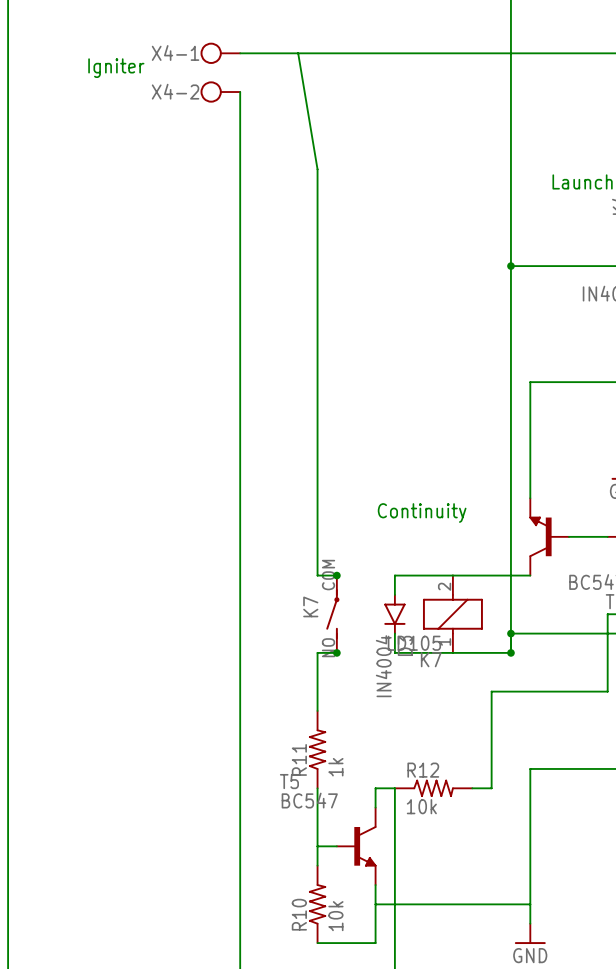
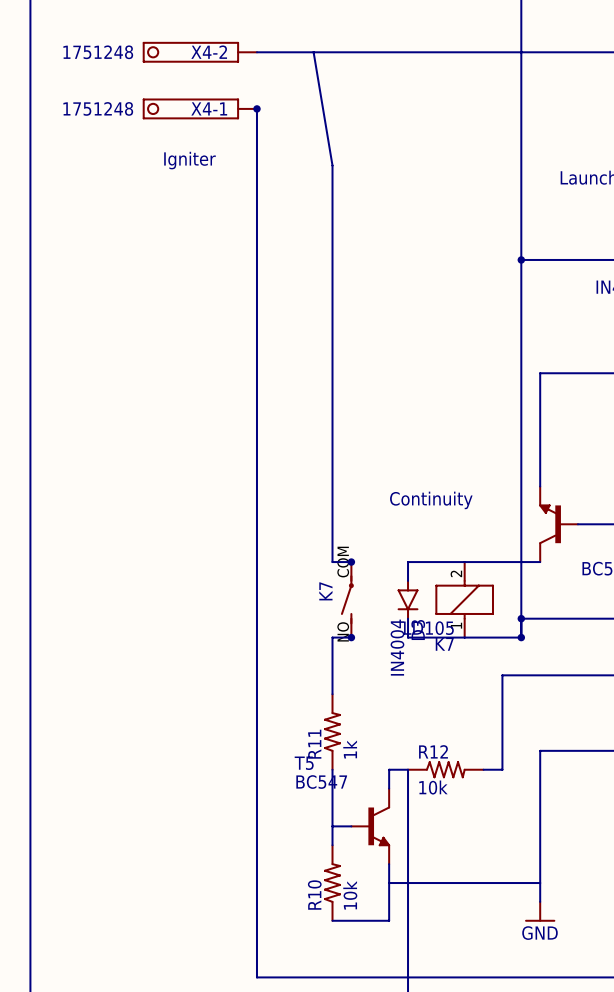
X4-1 symbol: [200, 42, 241, 64] -> [142, 98, 257, 120]
X4-2 value: none -> 1751248 (98, 52)
X4-1 name position: X4-1 (175, 53) -> X4-1 (209, 108)
text position: Igniter (116, 68) -> Igniter (189, 160)
X4-2 symbol: [200, 81, 241, 103] -> [142, 41, 257, 63]
X4-2 name position: X4-2 (175, 91) -> X4-2 (209, 52)
wire: (240, 92) (240, 111) -> none
X4-1 value: none -> 1751248 (98, 108)
junction: none -> (256, 108)

